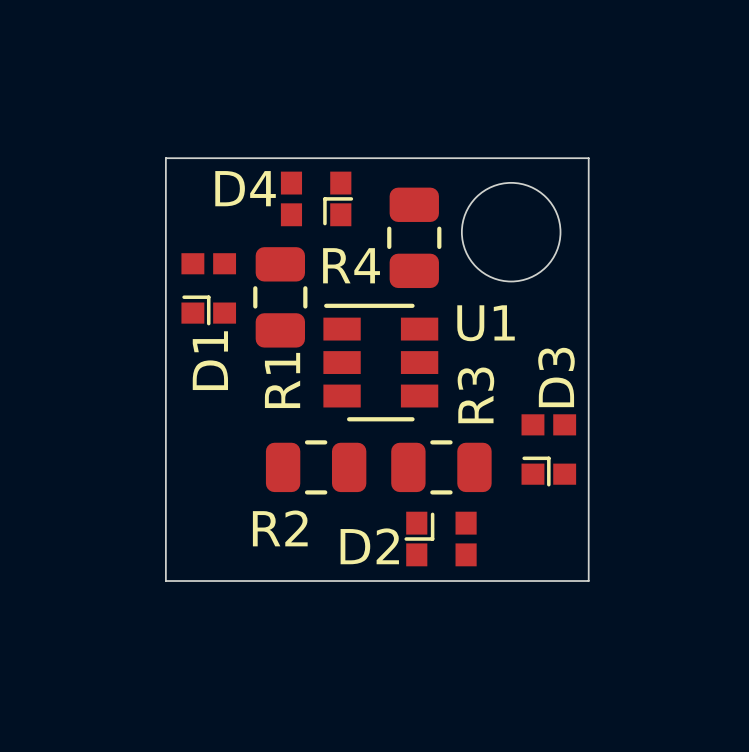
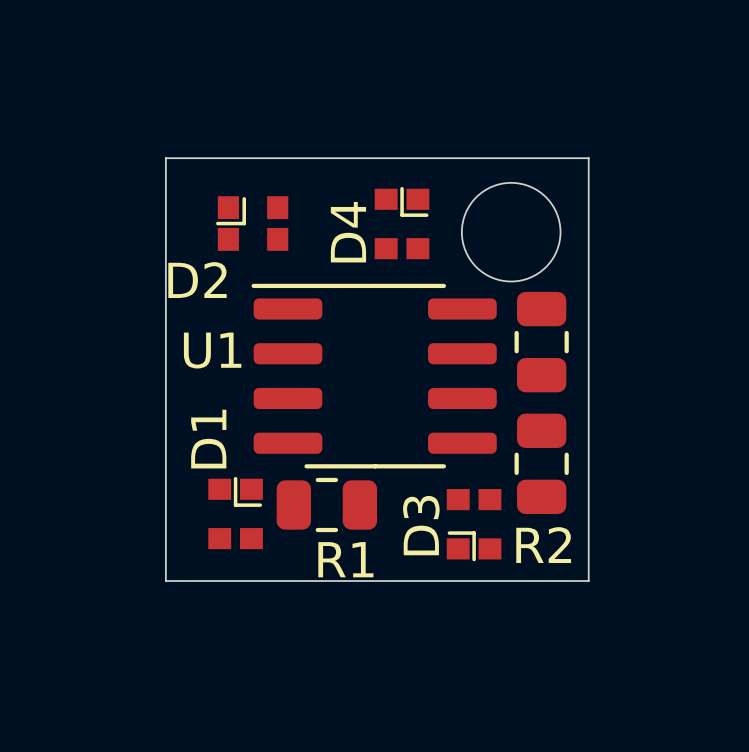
D4 rotation: 0° (317, 198) -> 90° counterclockwise (402, 223)
D4 position: (317, 198) -> (402, 223)
R4: (414, 237) -> none
D1 rotation: 0° (208, 289) -> 180° (235, 513)
D1 position: (208, 289) -> (235, 513)
R1 rotation: 0° (280, 297) -> 90° clockwise (326, 505)
R1 position: (280, 297) -> (326, 505)
U1 footprint: [323, 303, 439, 422] -> [251, 283, 497, 469]
U1 name position: U1 (486, 323) -> U1 (212, 350)
part: none -> (541, 342)
D3 name position: D3 (556, 377) -> D3 (421, 525)
D3 position: (548, 450) -> (474, 525)
R2 rotation: 0° (316, 467) -> 90° clockwise (541, 463)
R2 position: (316, 467) -> (541, 463)
R3: (441, 467) -> none
D2 position: (440, 539) -> (252, 223)
D2 name position: D2 (369, 546) -> D2 (197, 280)

